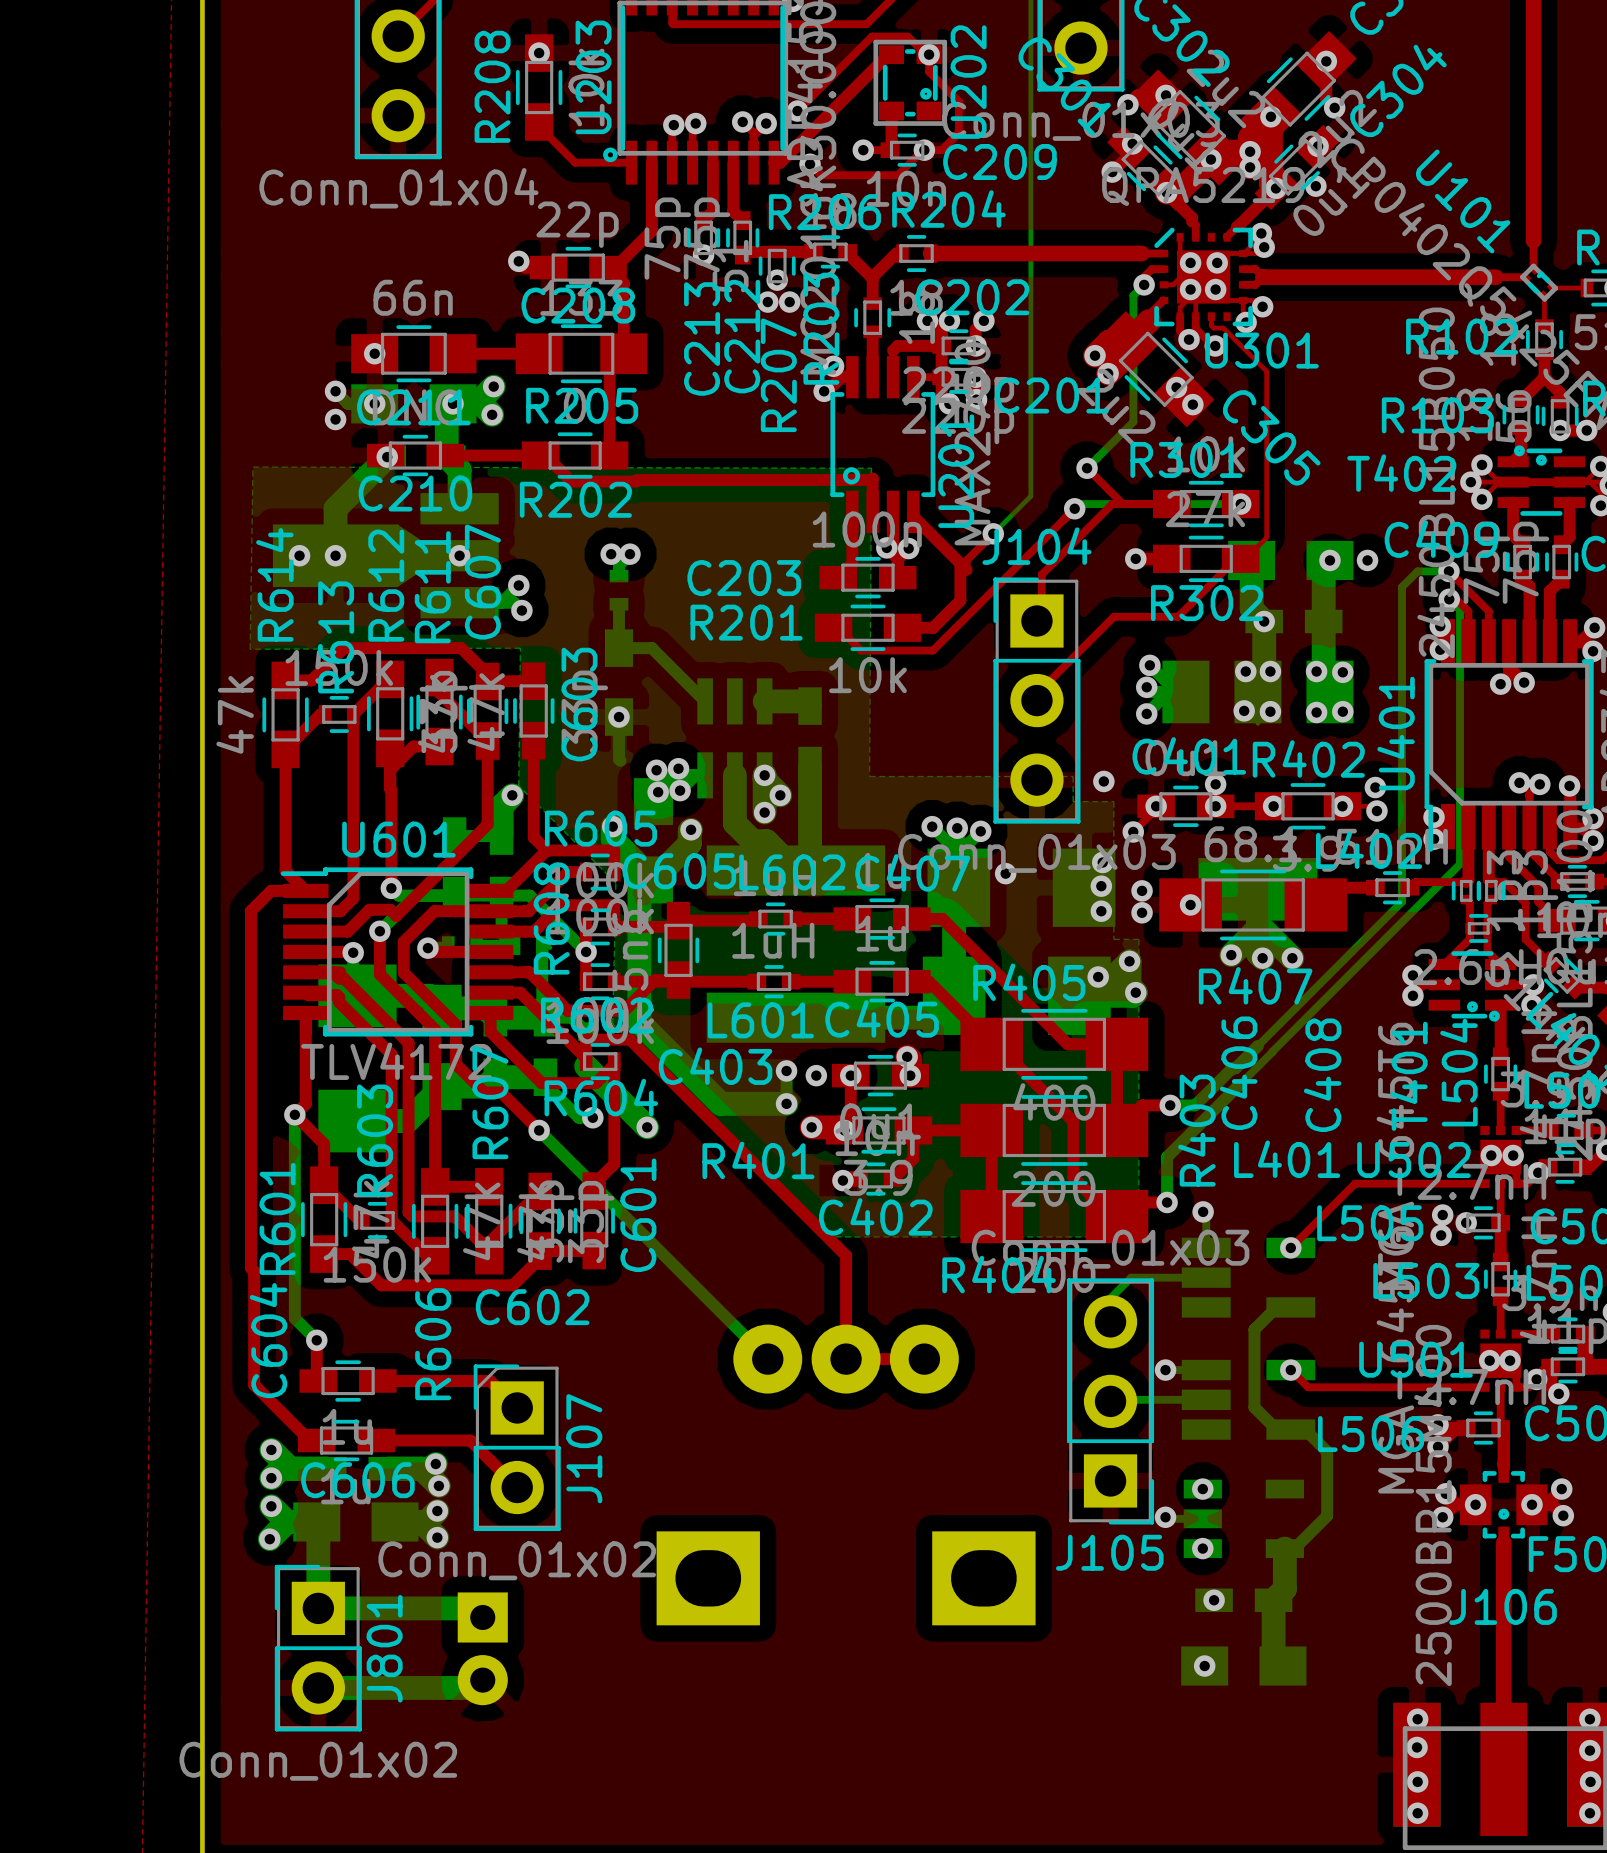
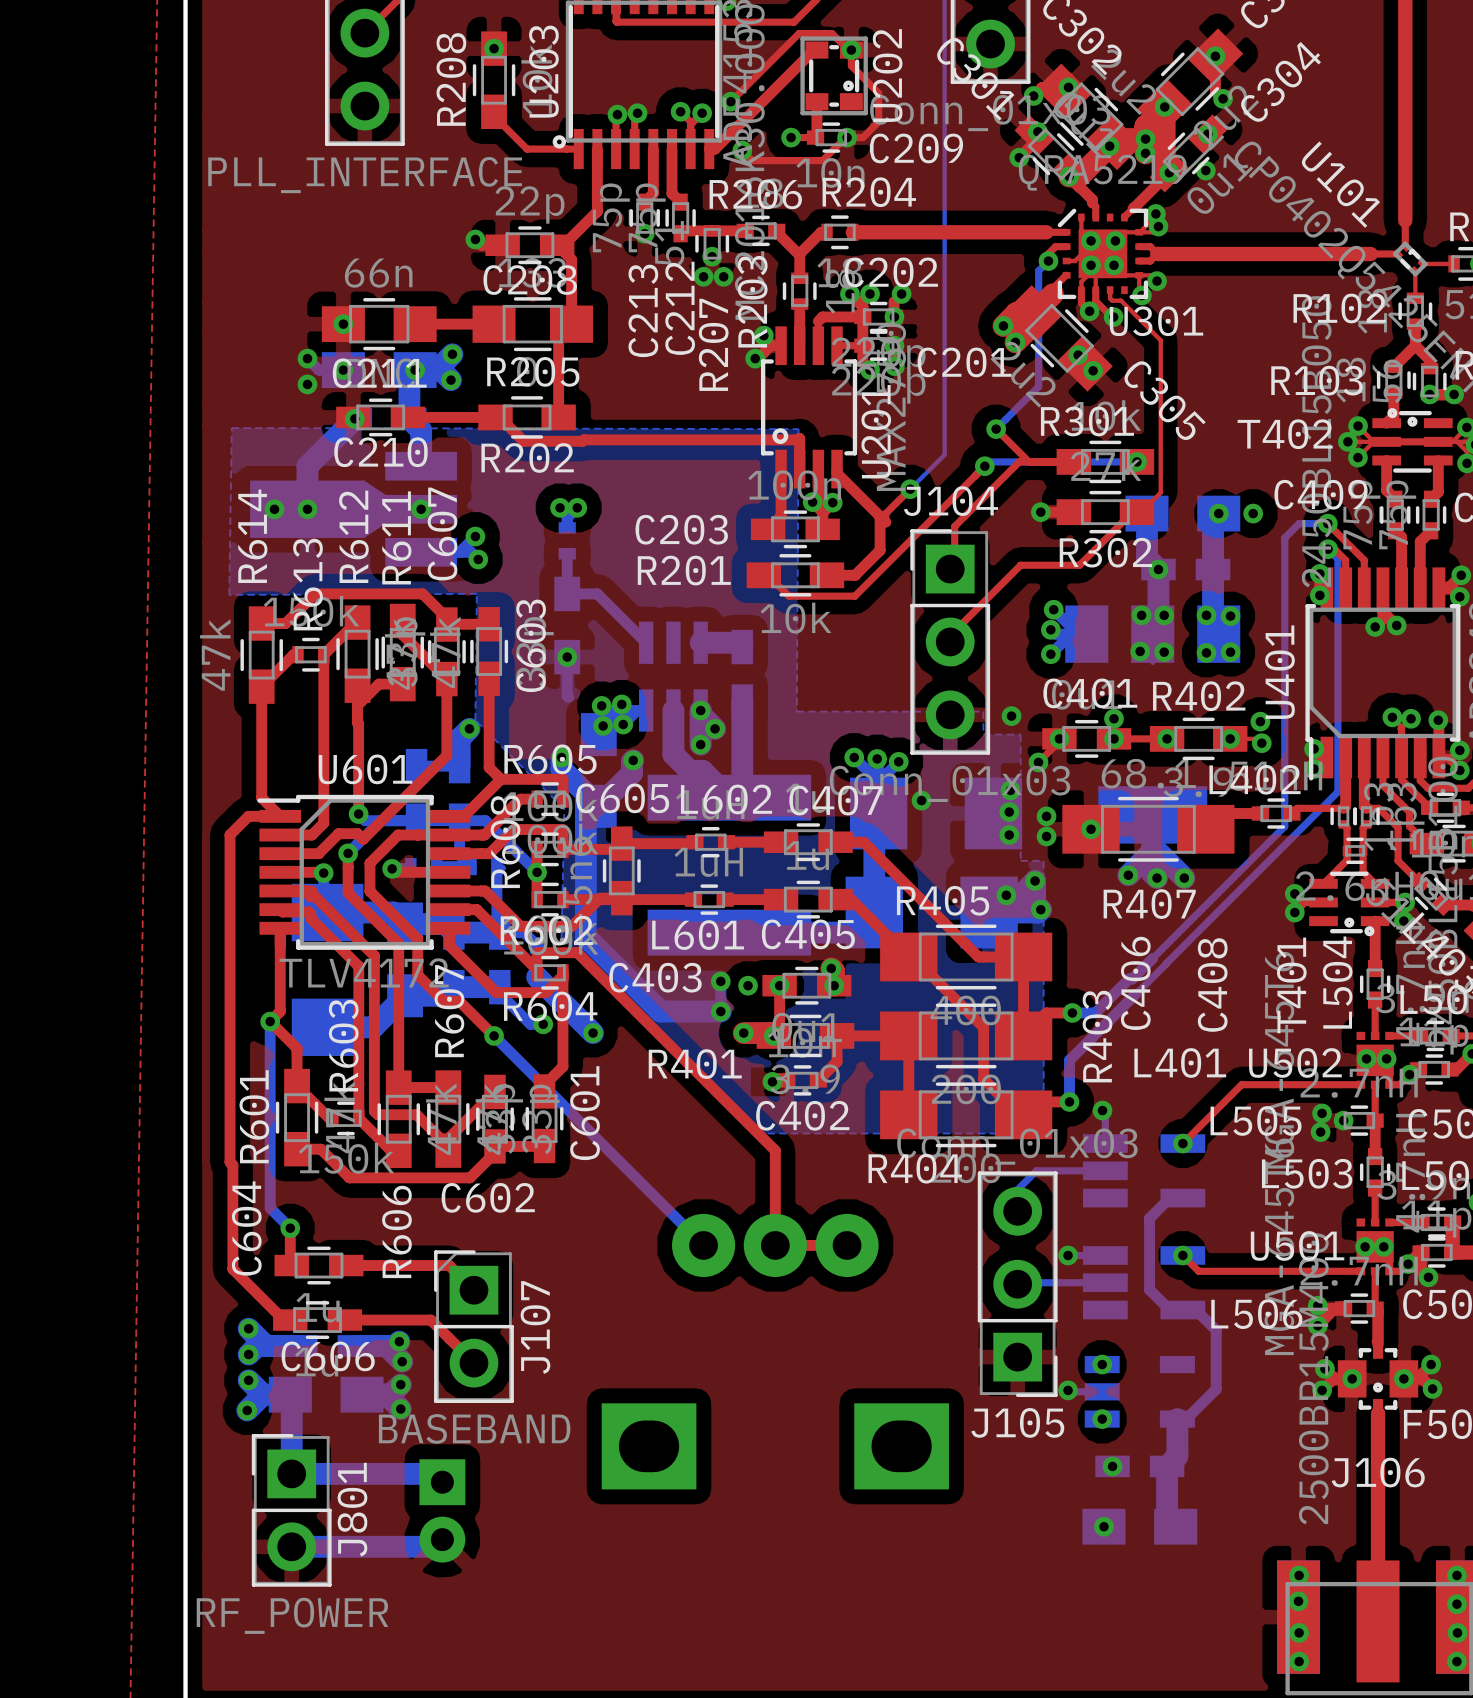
part value: Conn_01x04 (398, 188) -> PLL_INTERFACE (365, 175)
J107 value: Conn_01x02 (517, 1560) -> BASEBAND (474, 1428)
J801 value: Conn_01x02 (318, 1761) -> RF_POWER (292, 1615)

